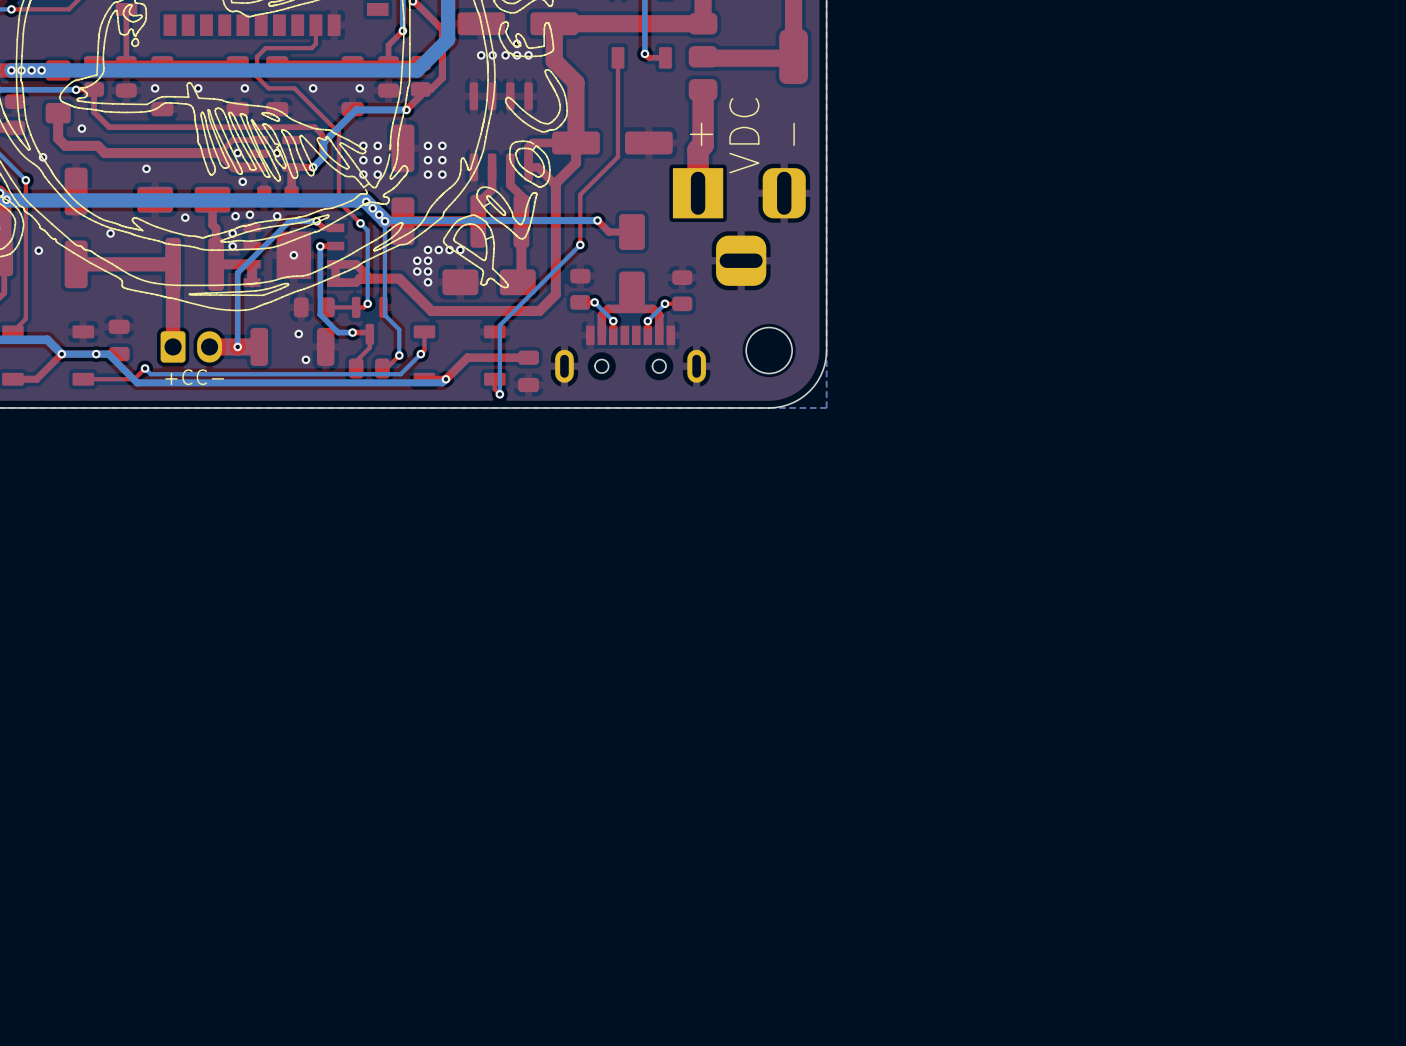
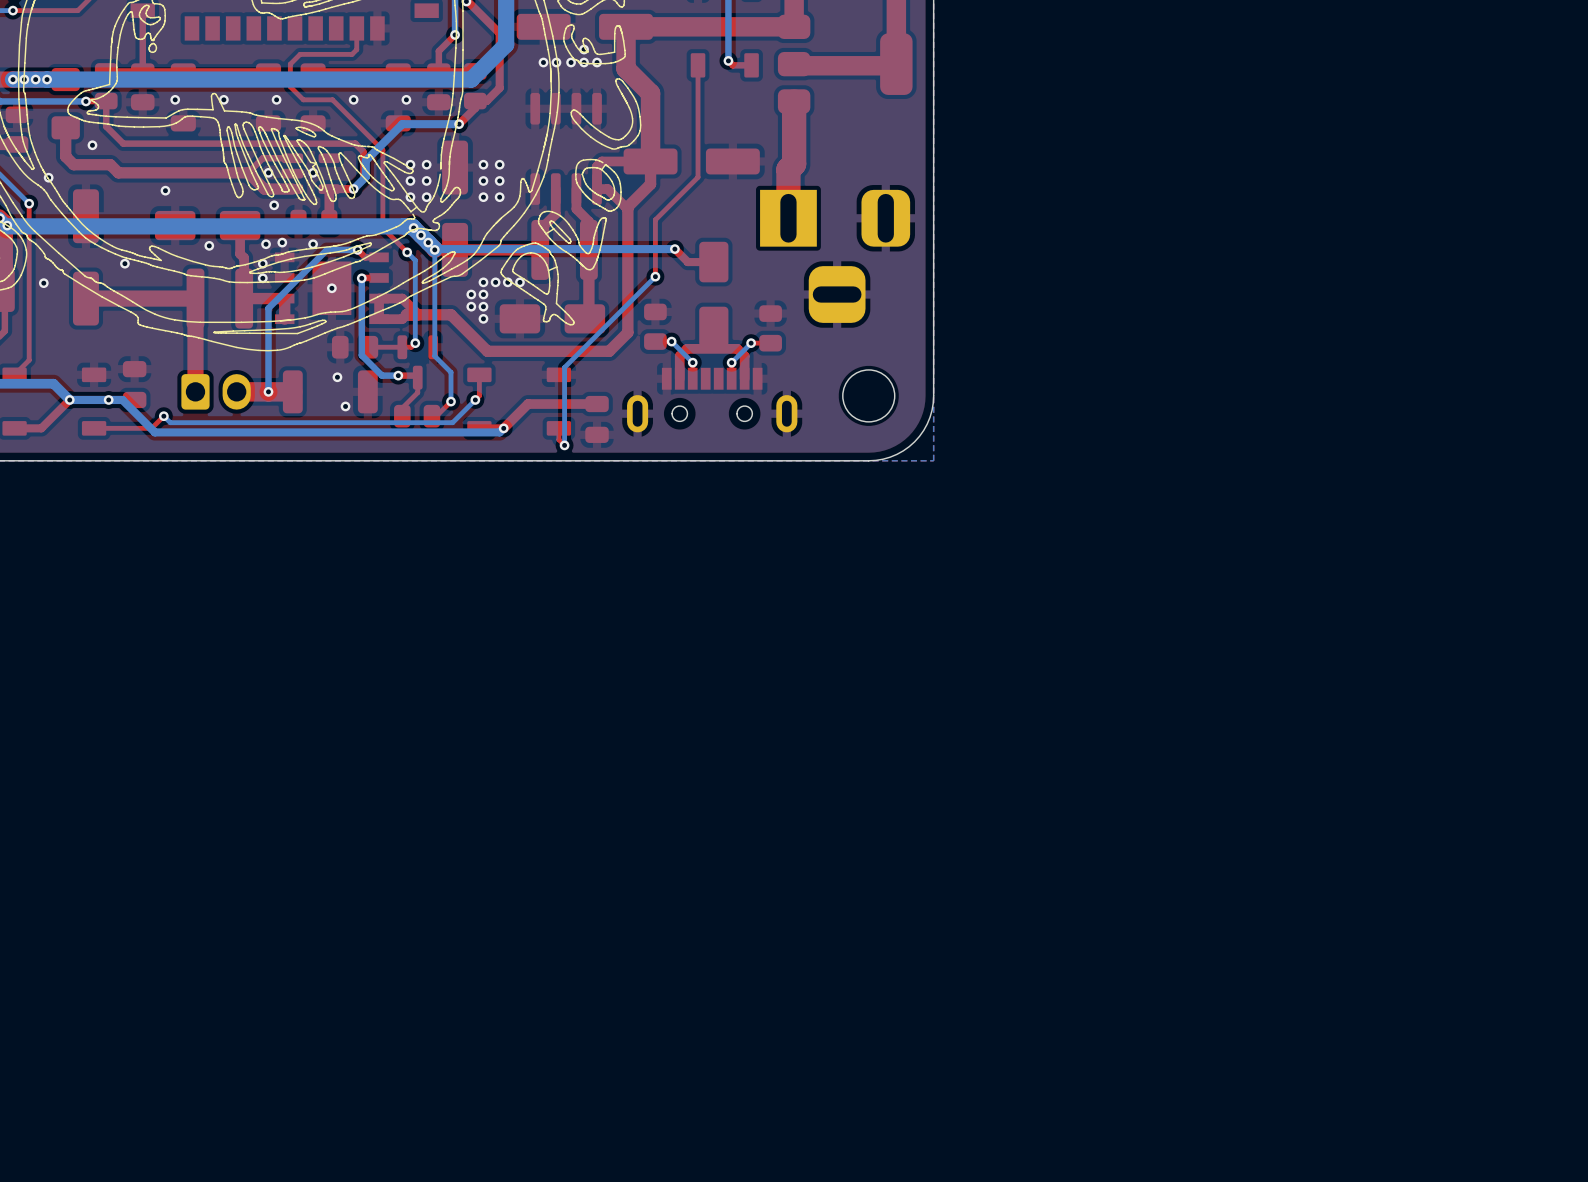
text: + (701, 134) -> none
text: - (794, 134) -> none
text: VDC (744, 135) -> none
text: +CC- (194, 377) -> none

